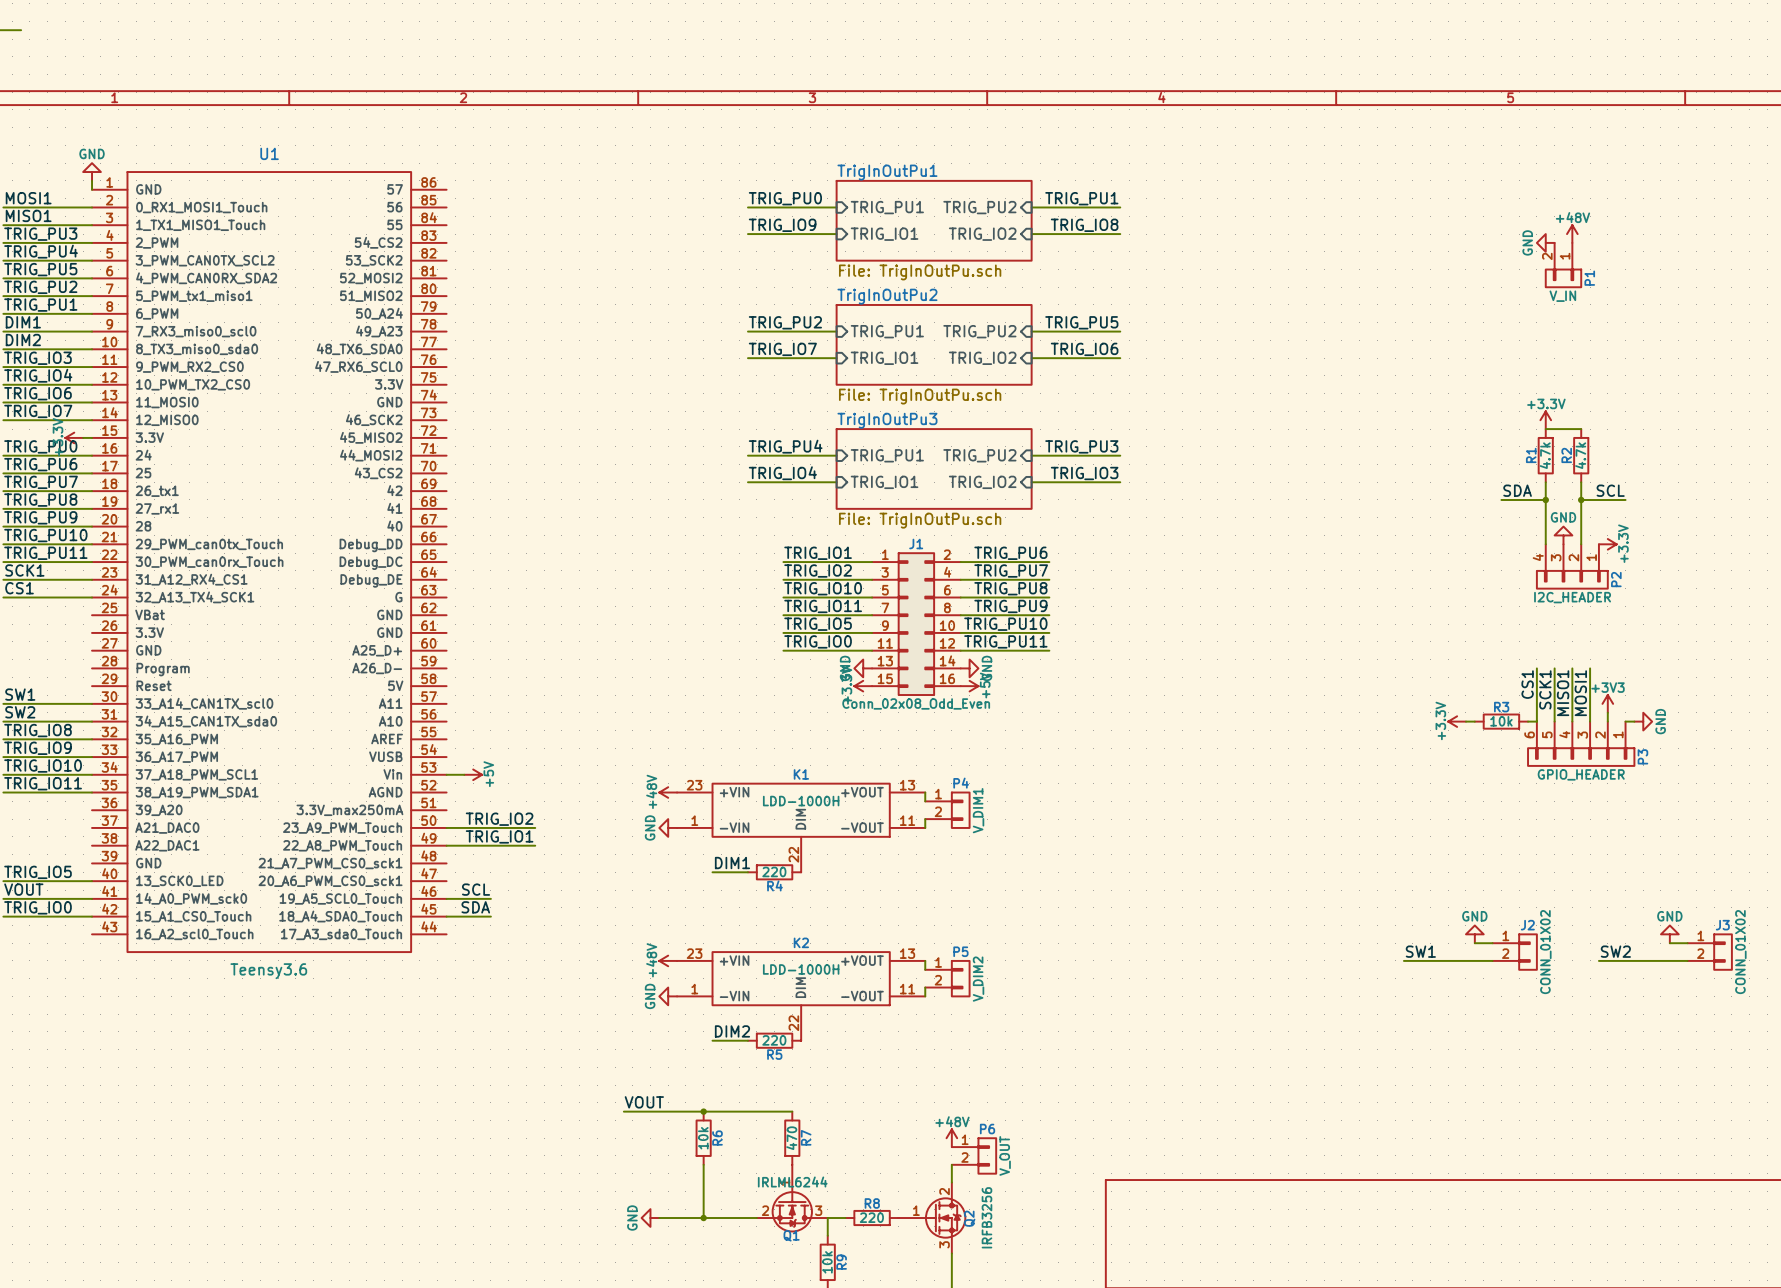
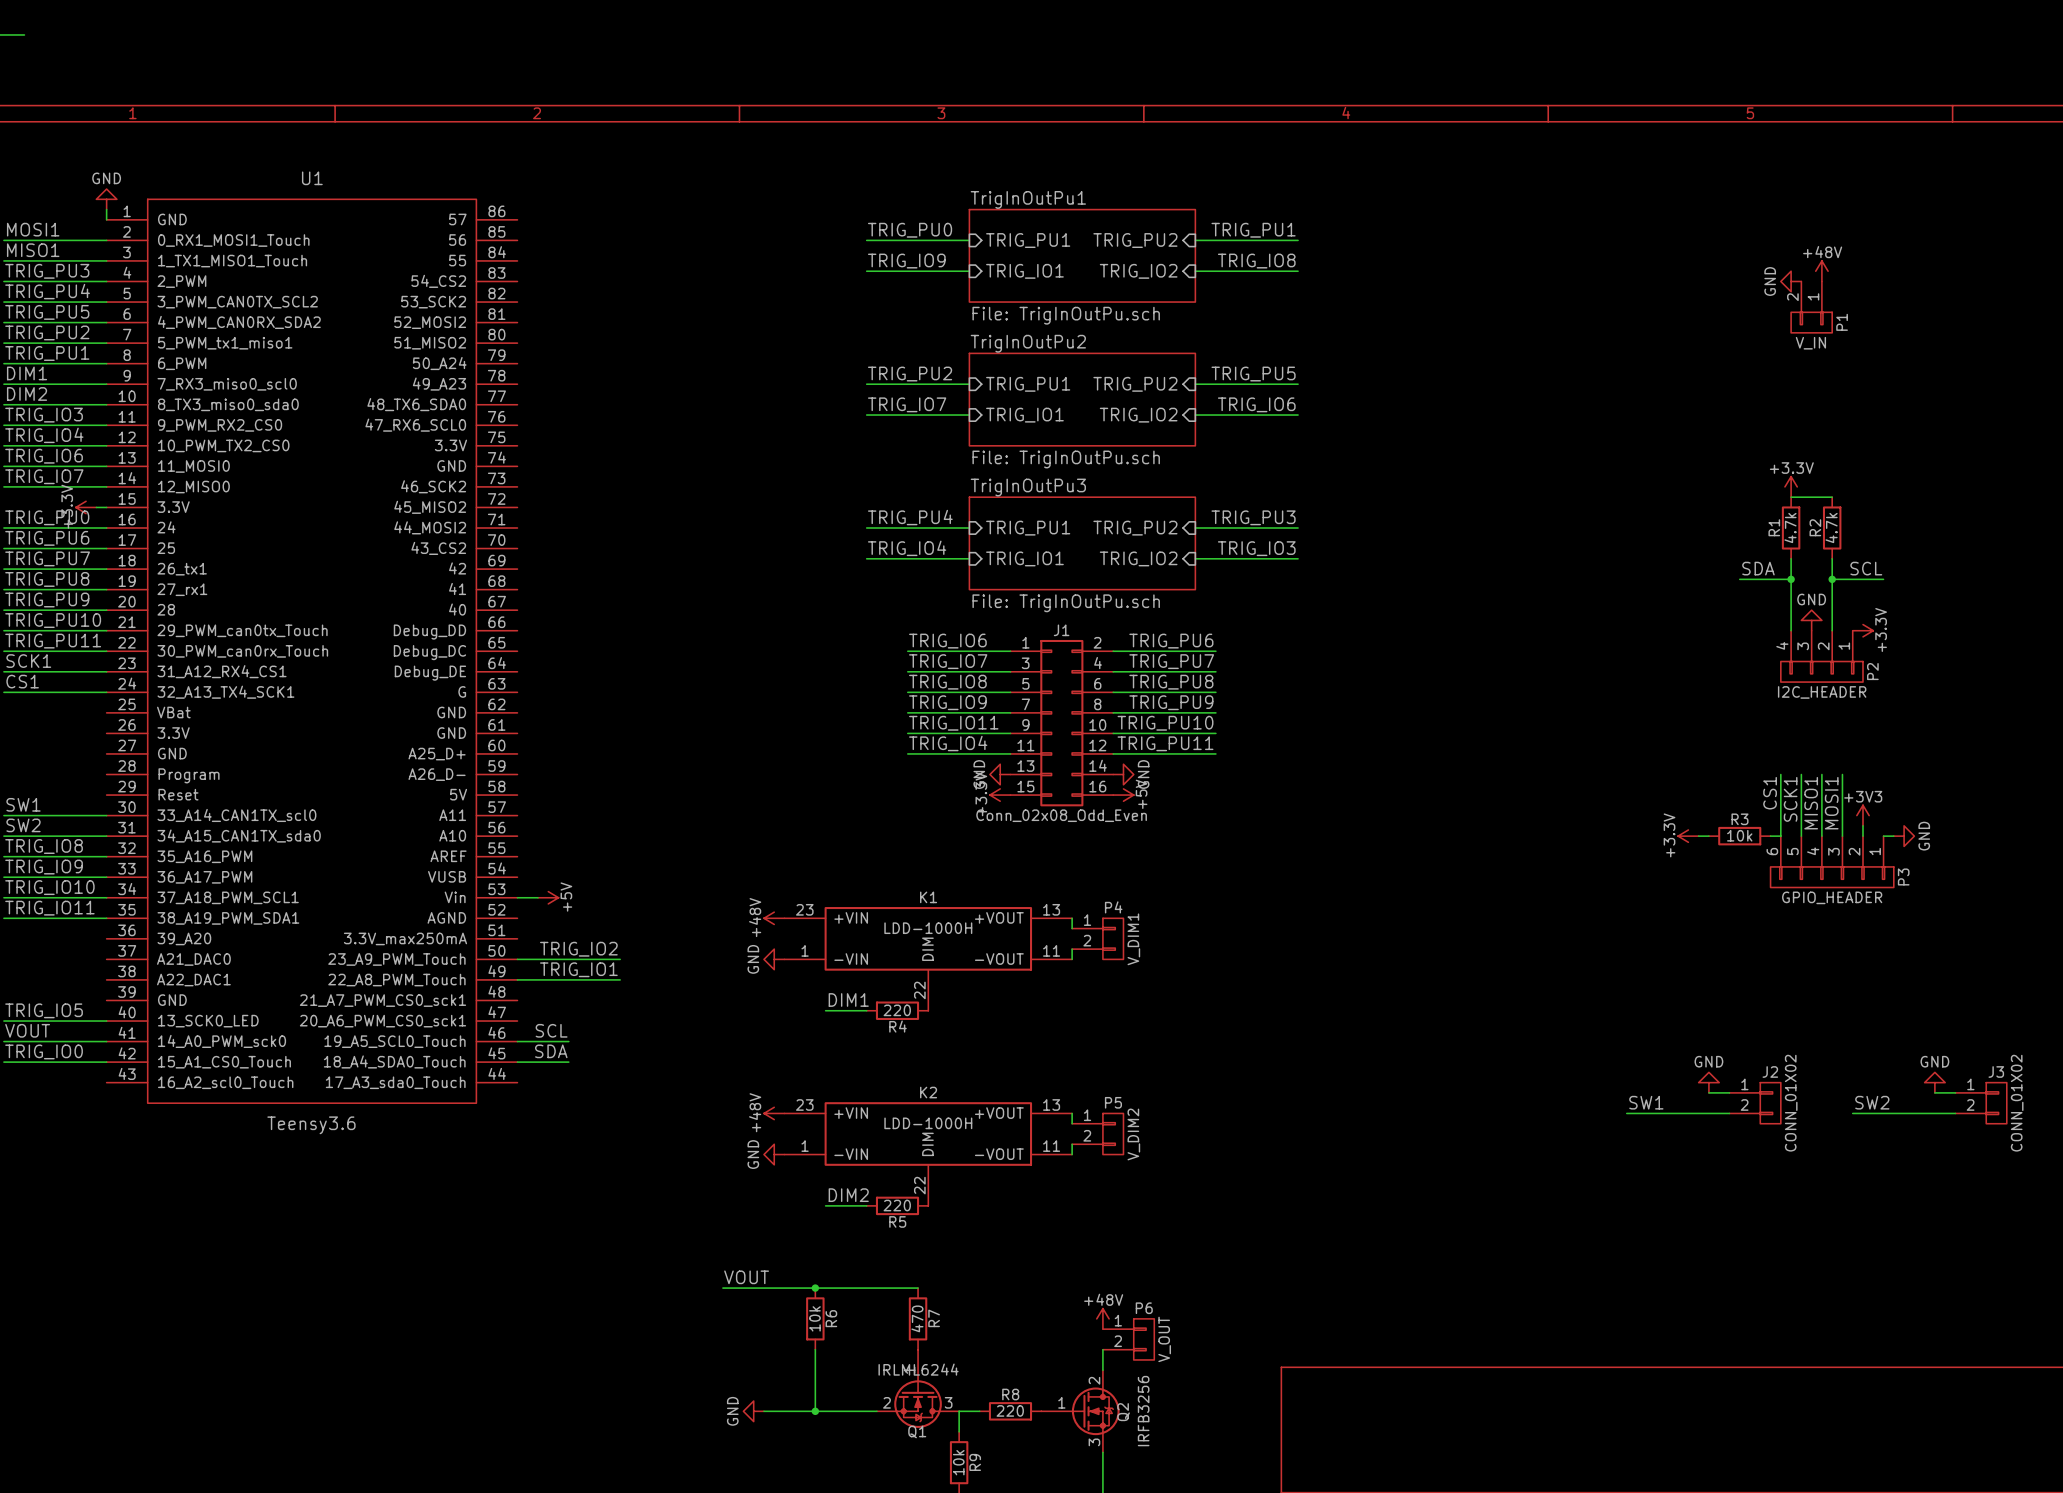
label: TRIG_IO1 (818, 553) -> TRIG_IO6 (947, 641)
label: TRIG_IO2 (818, 571) -> TRIG_IO7 (948, 661)
label: TRIG_IO10 (823, 588) -> TRIG_IO8 (947, 682)
label: TRIG_IO11 (823, 606) -> TRIG_IO9 (947, 702)
label: TRIG_IO5 (818, 624) -> TRIG_IO11 (953, 723)
label: TRIG_IO0 (818, 641) -> TRIG_IO4 (948, 743)

